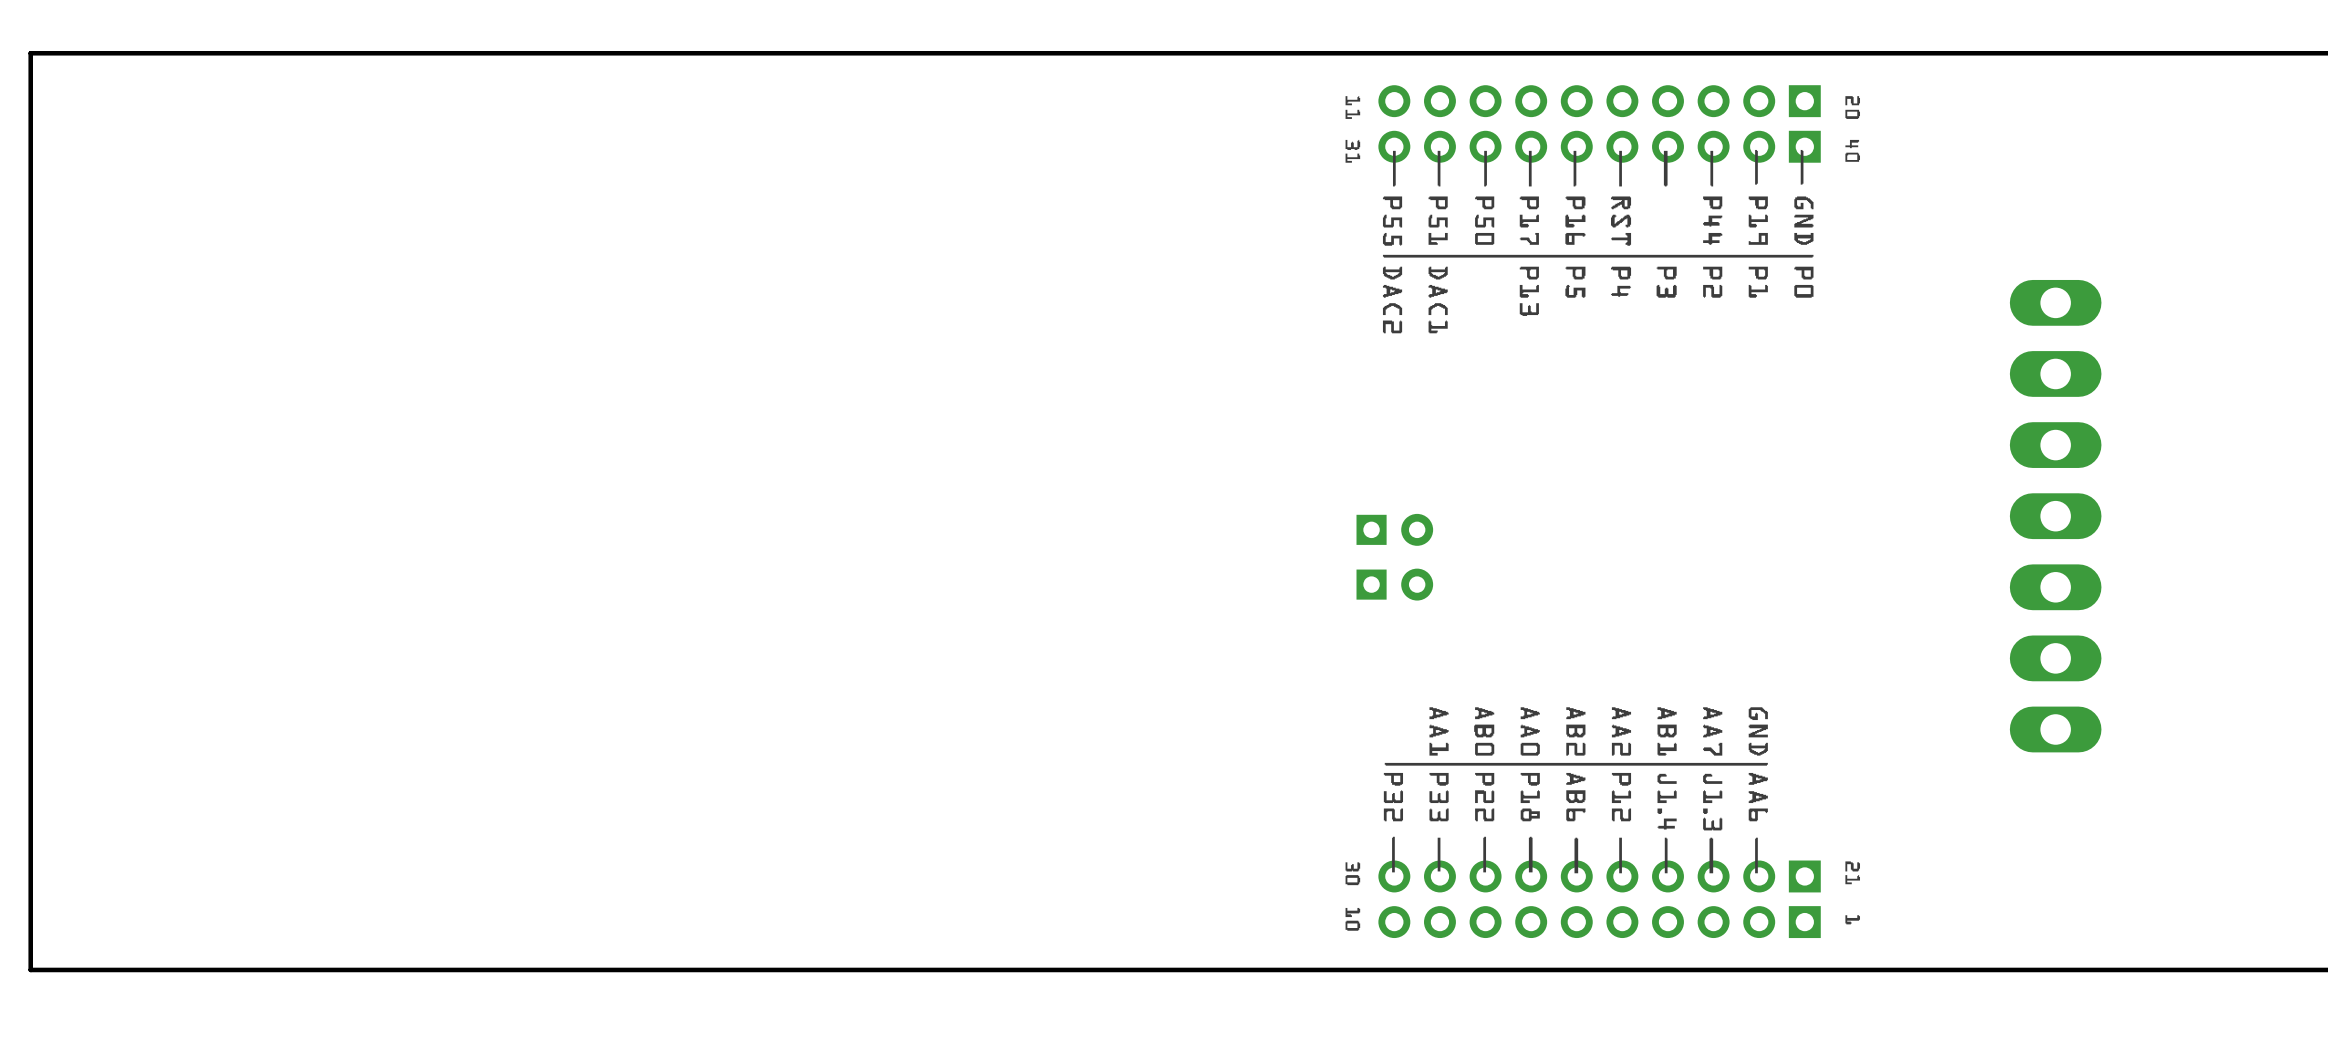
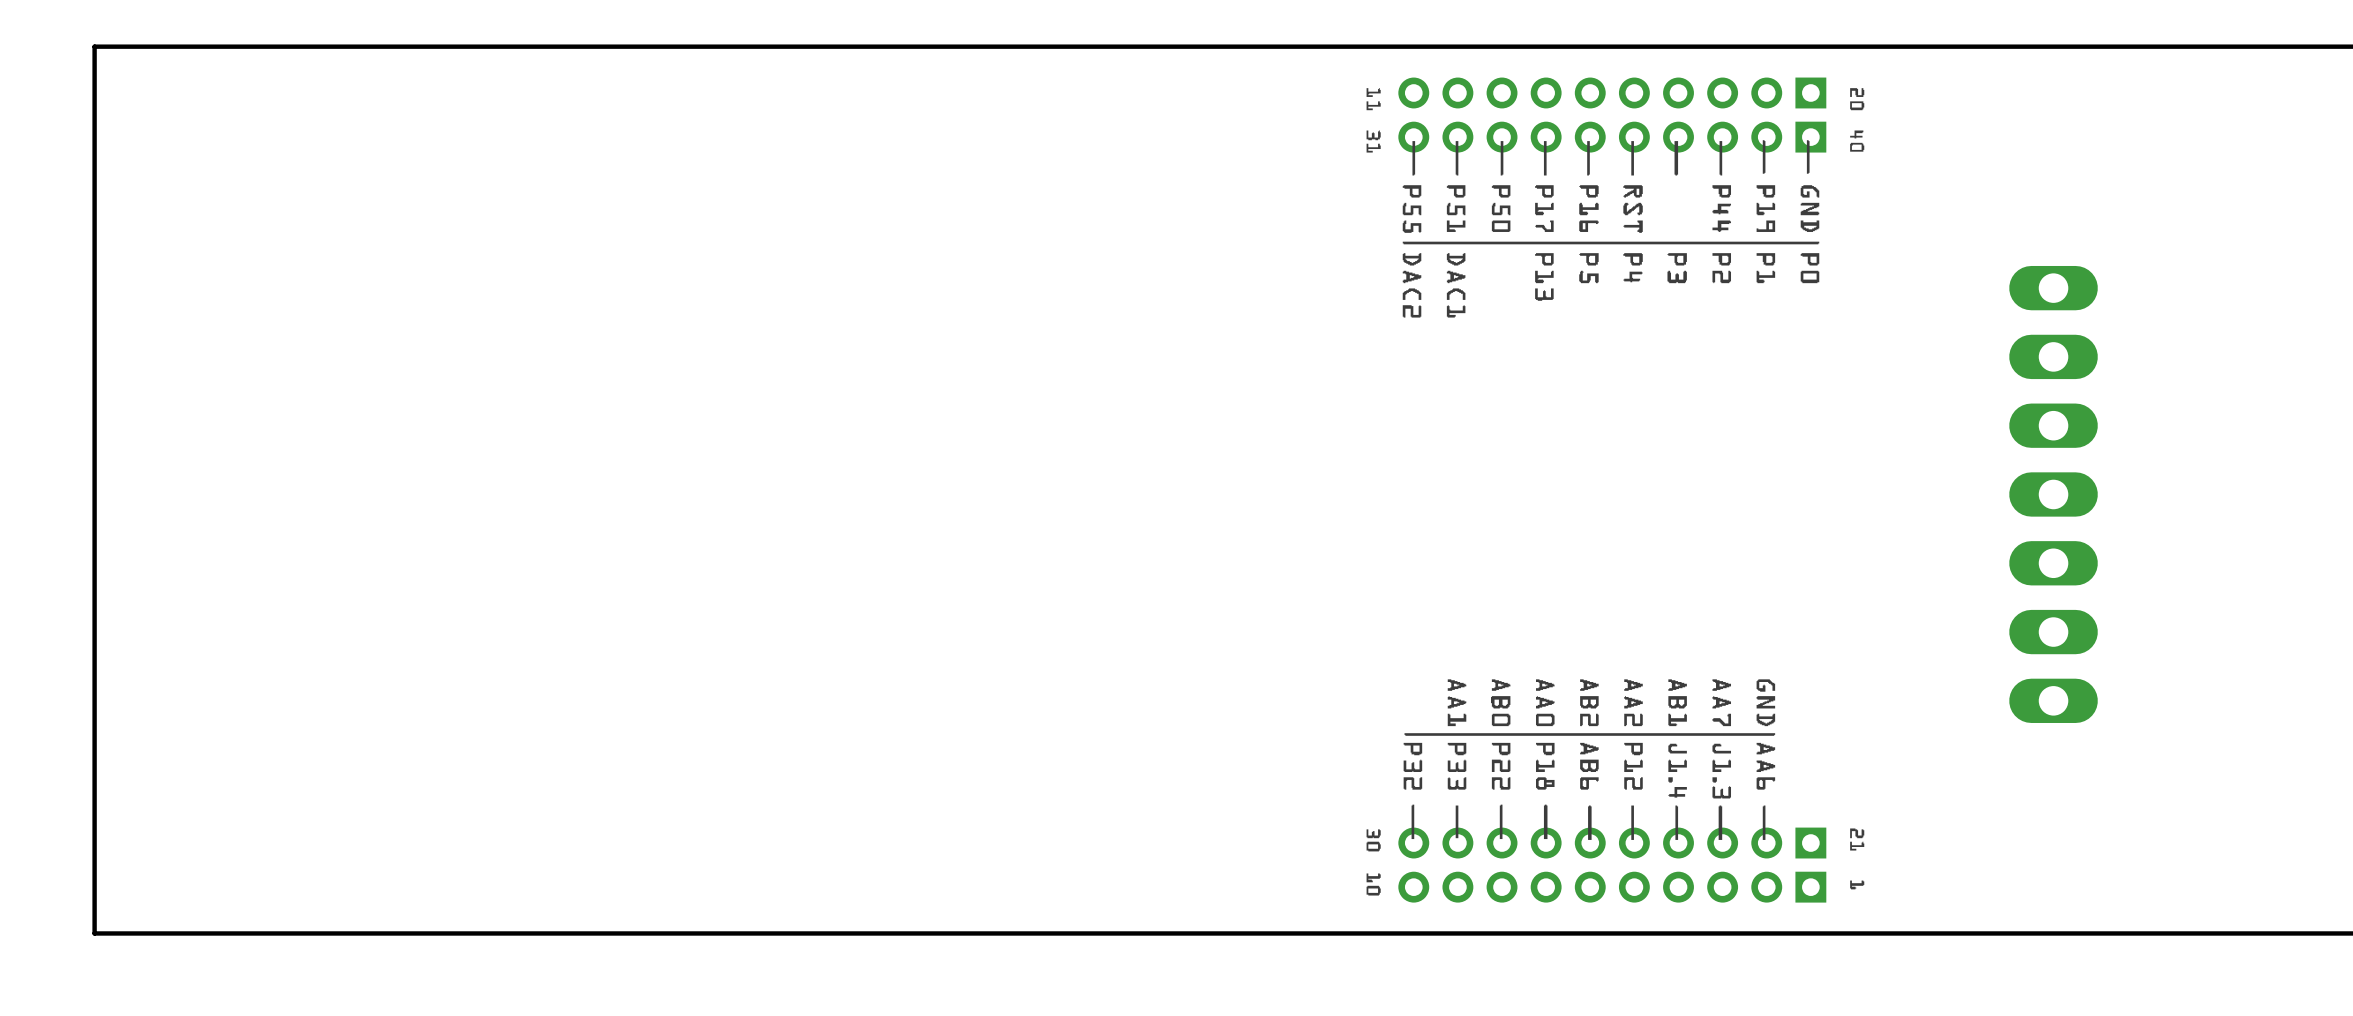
part: (1394, 529) -> none
part: (1394, 584) -> none

